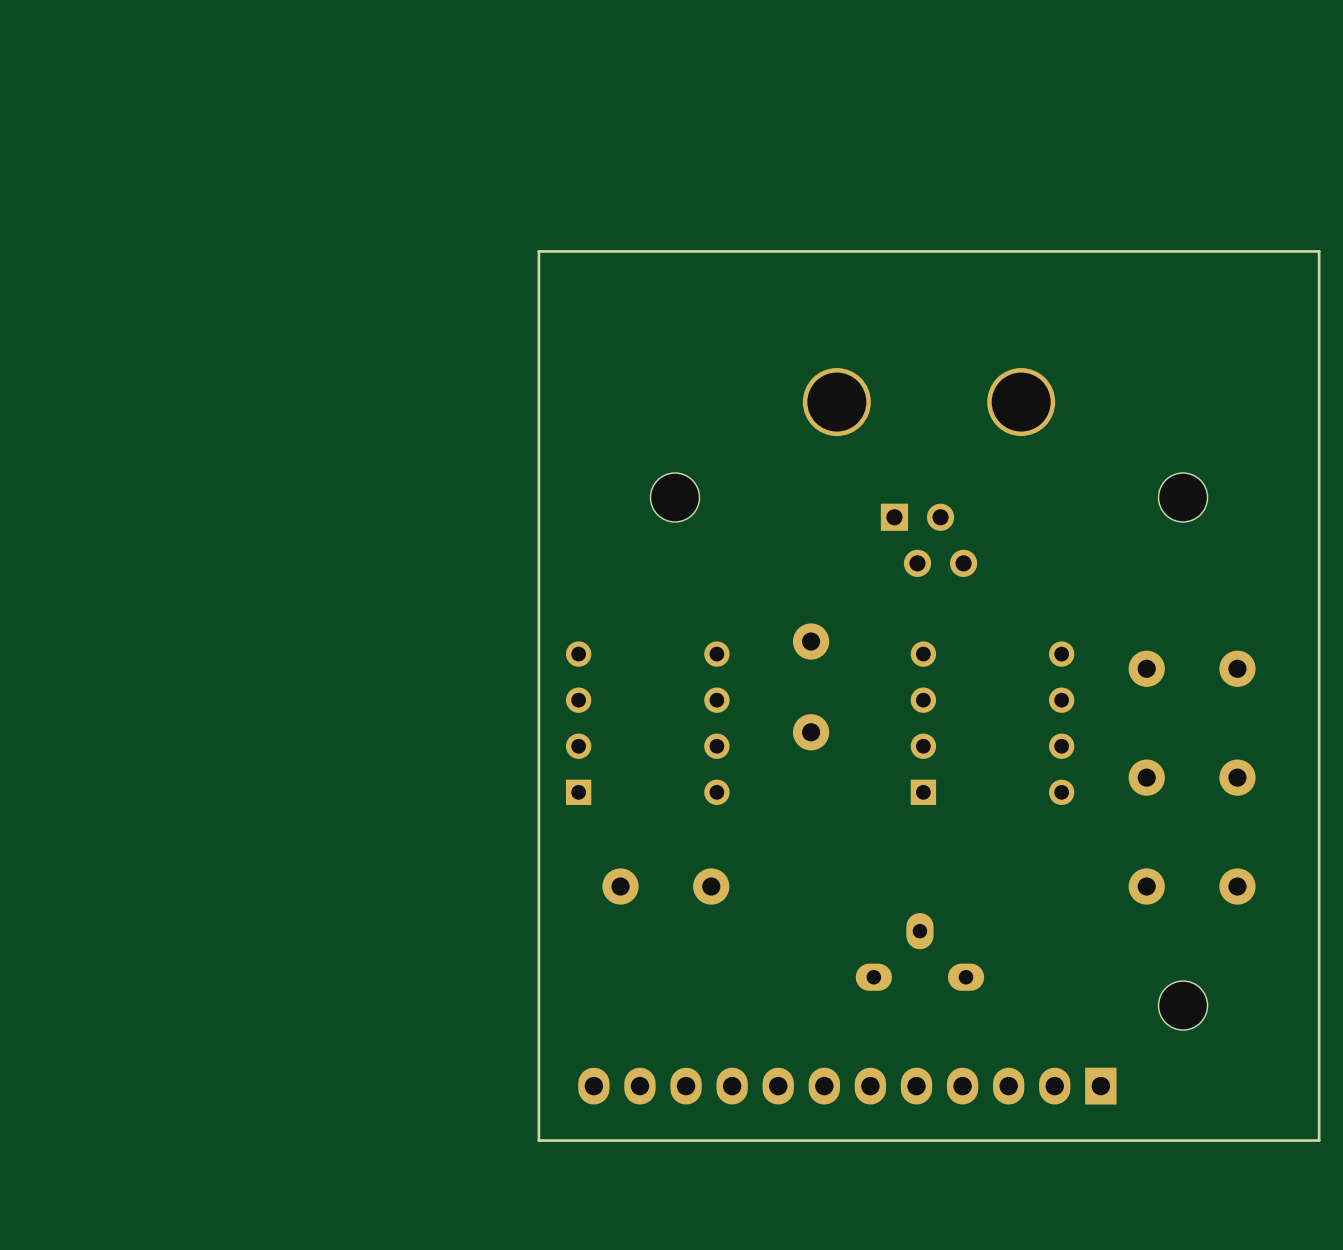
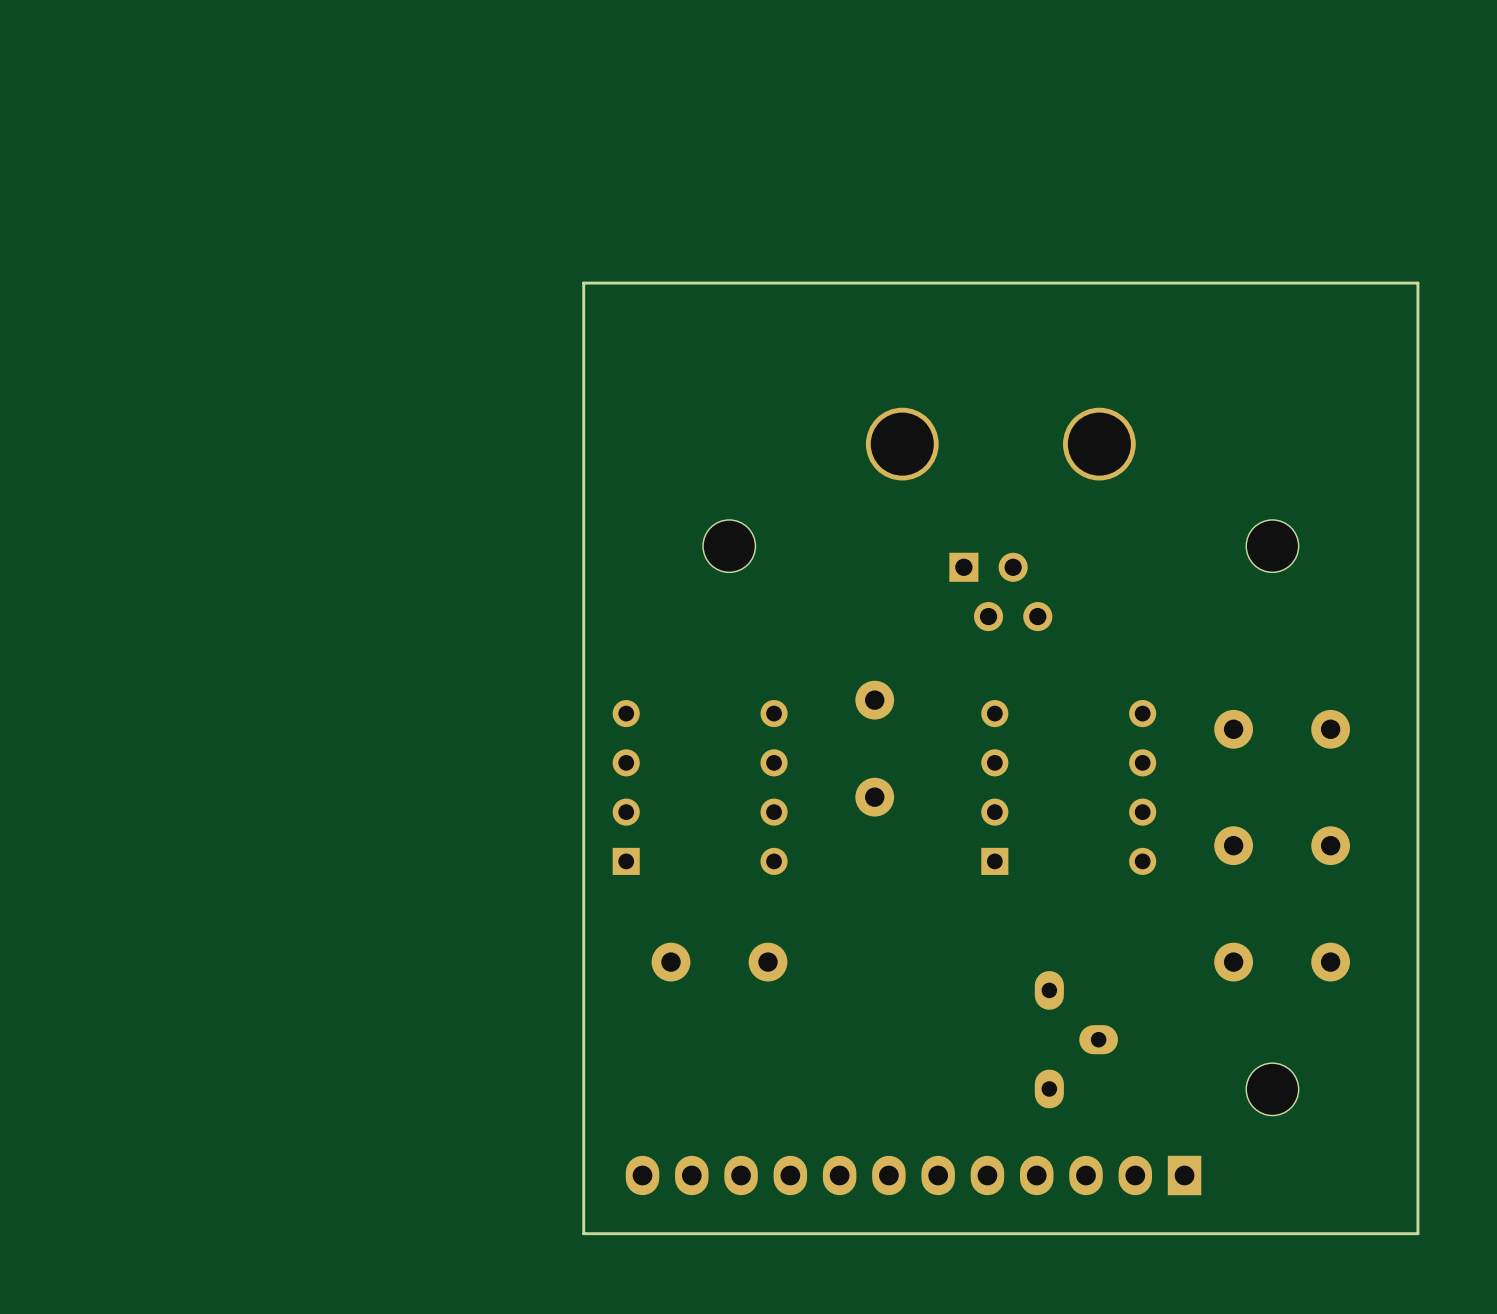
part rotation: 0° (919, 951) -> 90° clockwise (1076, 1039)
part position: (919, 951) -> (1076, 1039)

